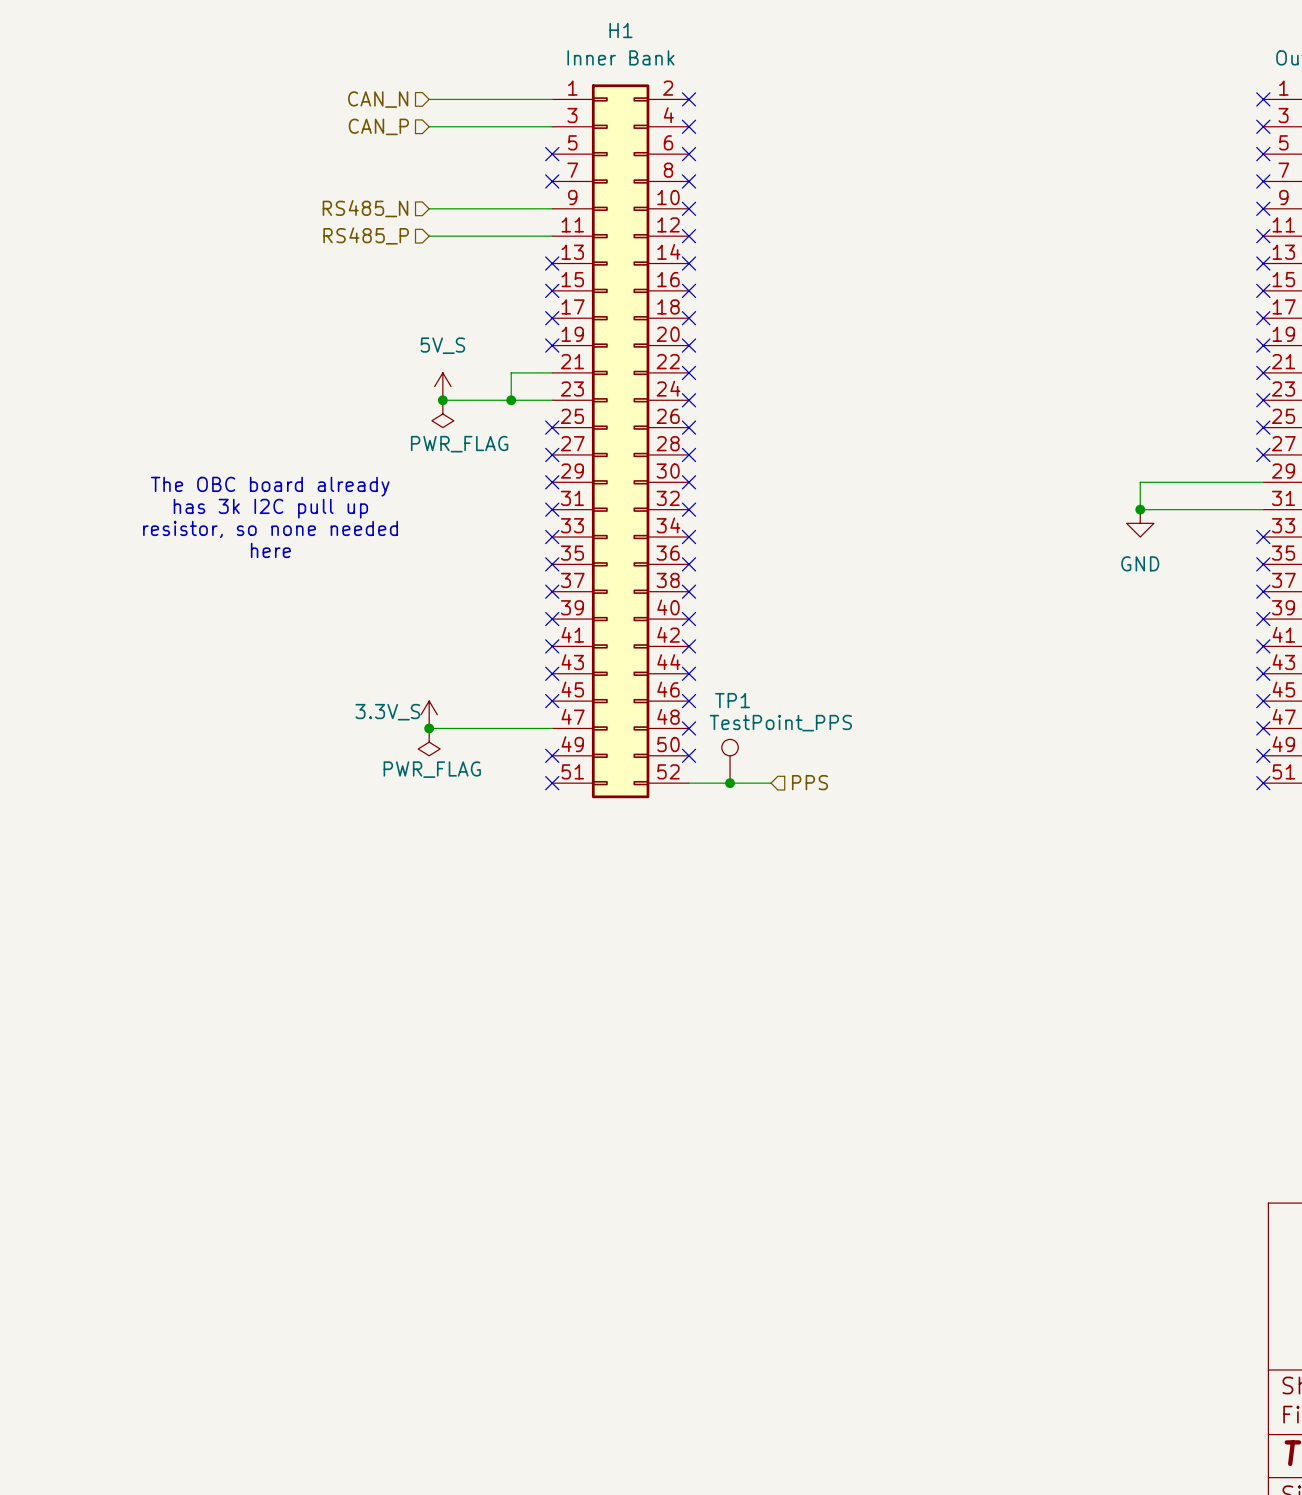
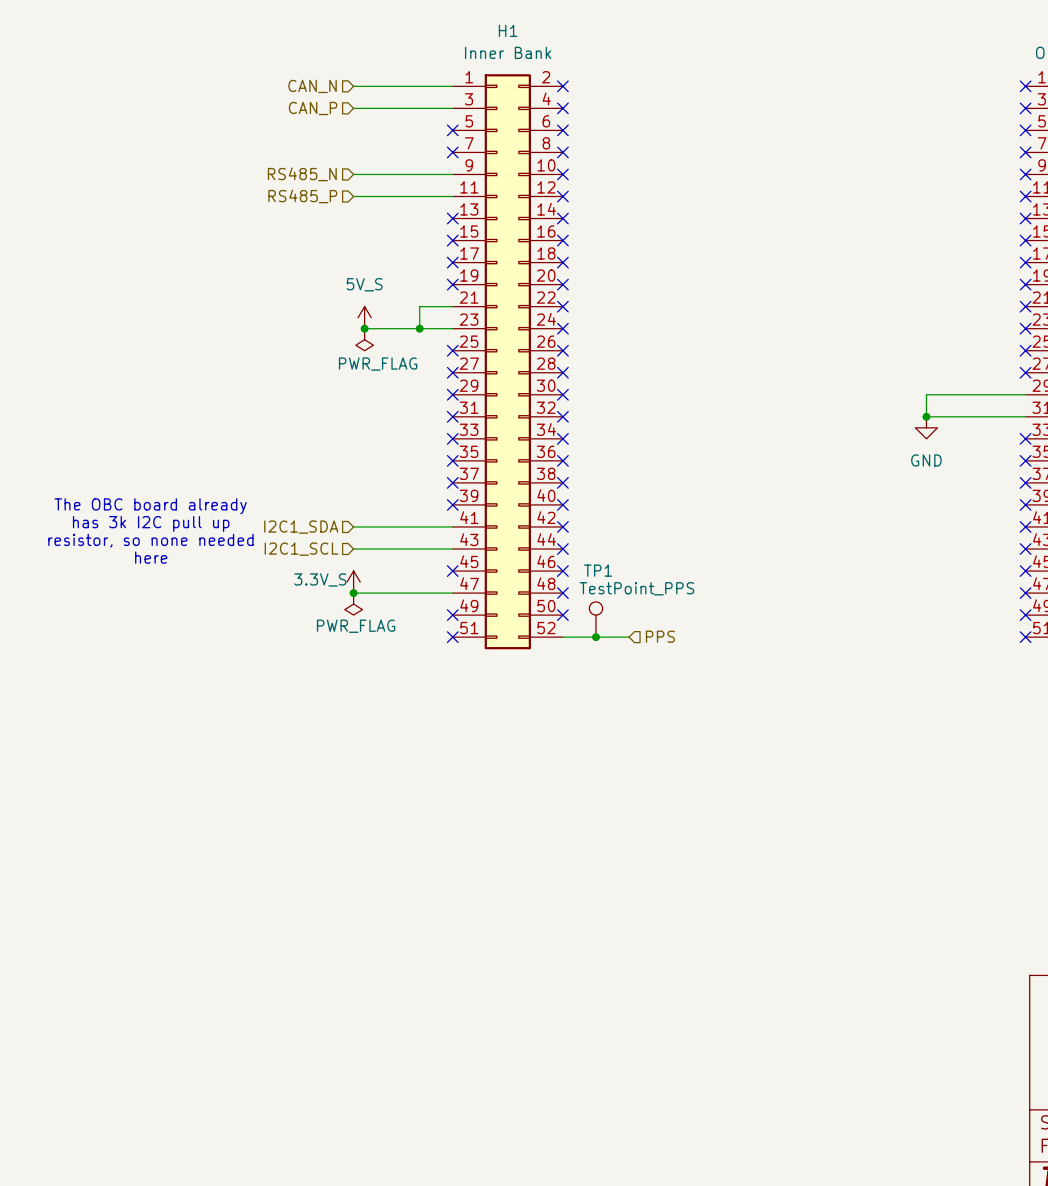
text position: The OBC board already (270, 486) -> The OBC board already (150, 506)
text position: has 3k I2C pull up (270, 508) -> has 3k I2C pull up (151, 523)
text position: resistor, so none needed (270, 529) -> resistor, so none needed (150, 540)
text position: here (270, 550) -> here (151, 557)
hierarchical label: none -> I2C1_SDA (301, 527)
wire: none -> (353, 526) (452, 526)
no-connect mark: (552, 646) -> none
hierarchical label: none -> I2C1_SCL (301, 549)
wire: none -> (353, 549) (452, 549)
no-connect mark: (552, 673) -> none

